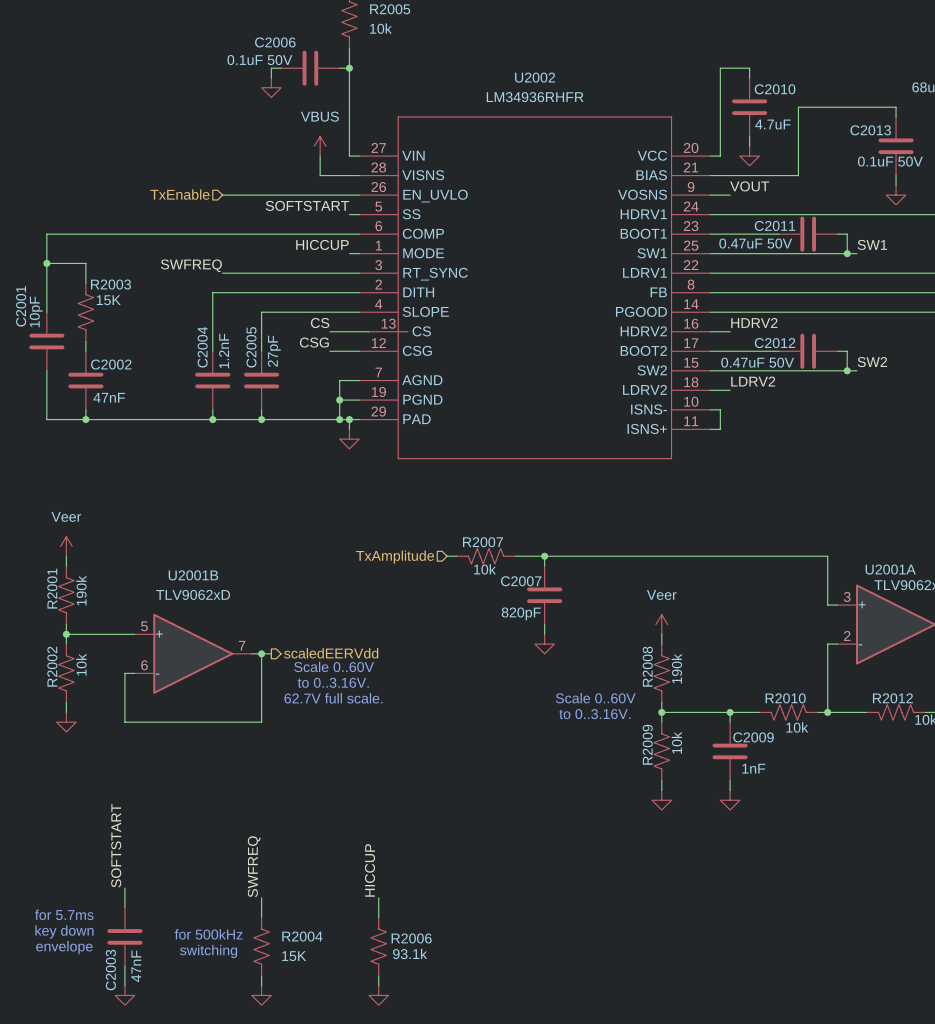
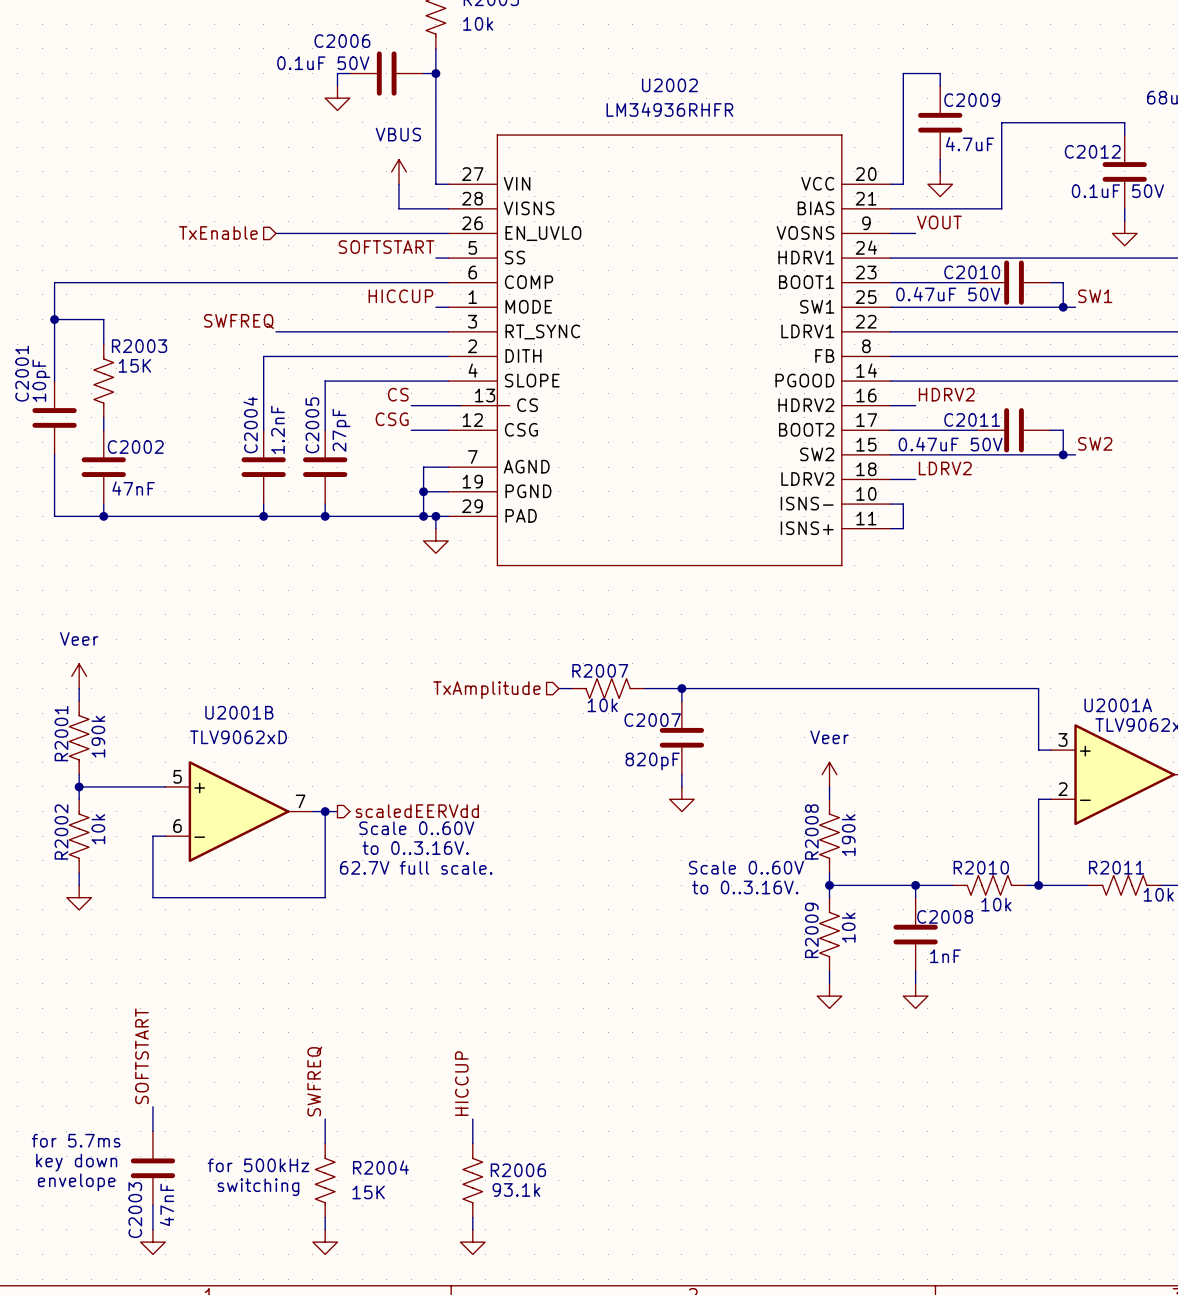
C2010 name: C2010 (775, 89) -> C2009 (972, 100)
C2013 name: C2013 (870, 130) -> C2012 (1092, 151)
C2011 name: C2011 (775, 225) -> C2010 (972, 272)
C2012 name: C2012 (775, 343) -> C2011 (972, 419)
R2012 name: R2012 (892, 698) -> R2011 (1116, 867)
C2009 name: C2009 (753, 737) -> C2008 (945, 916)

